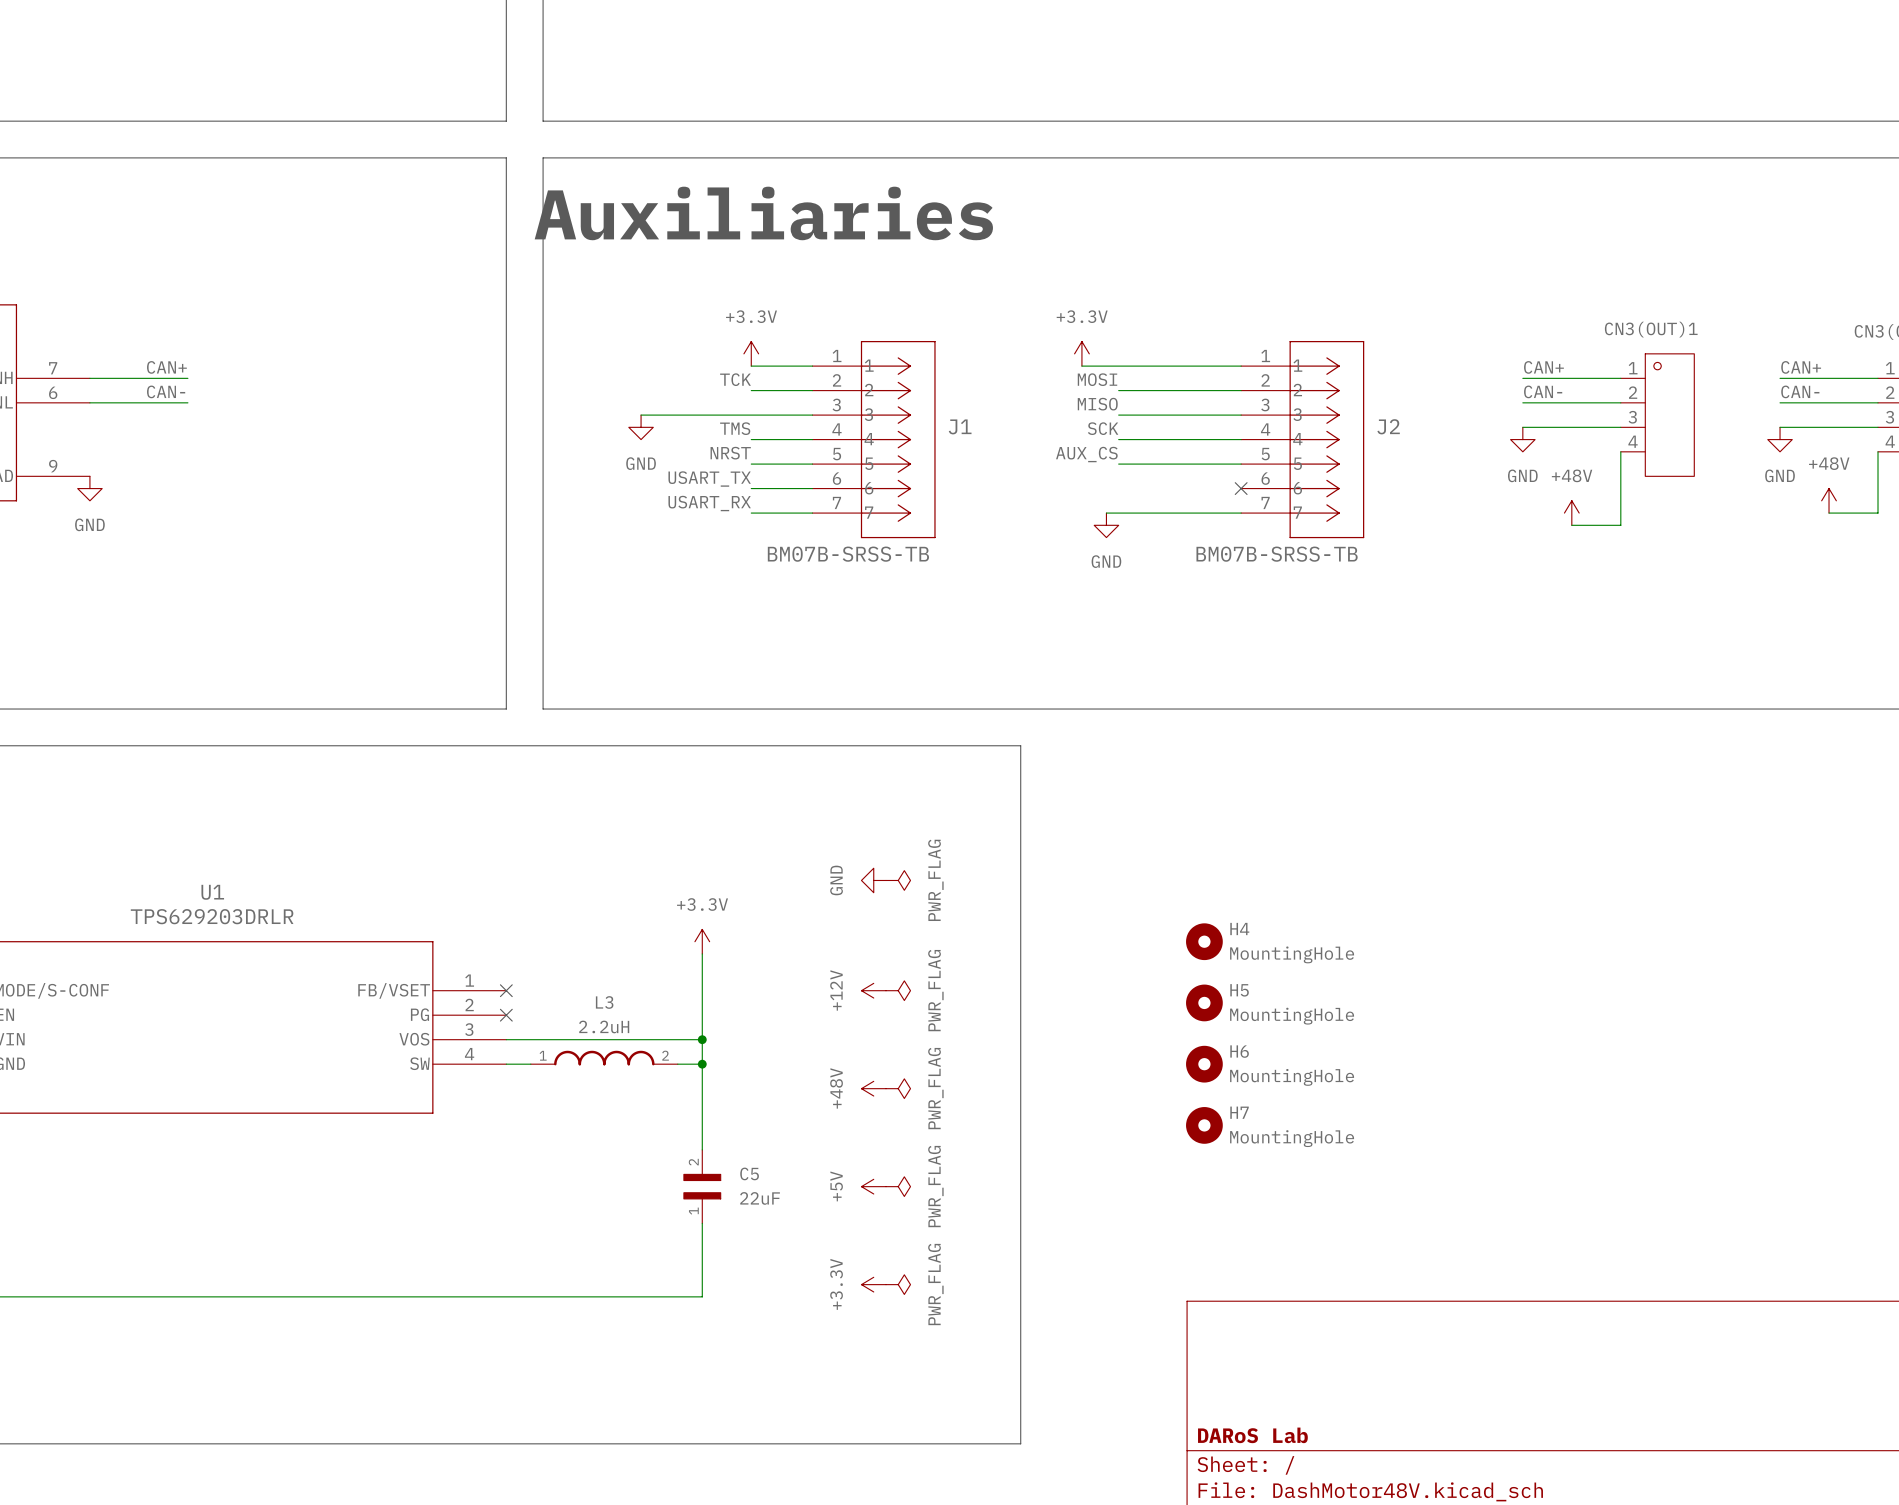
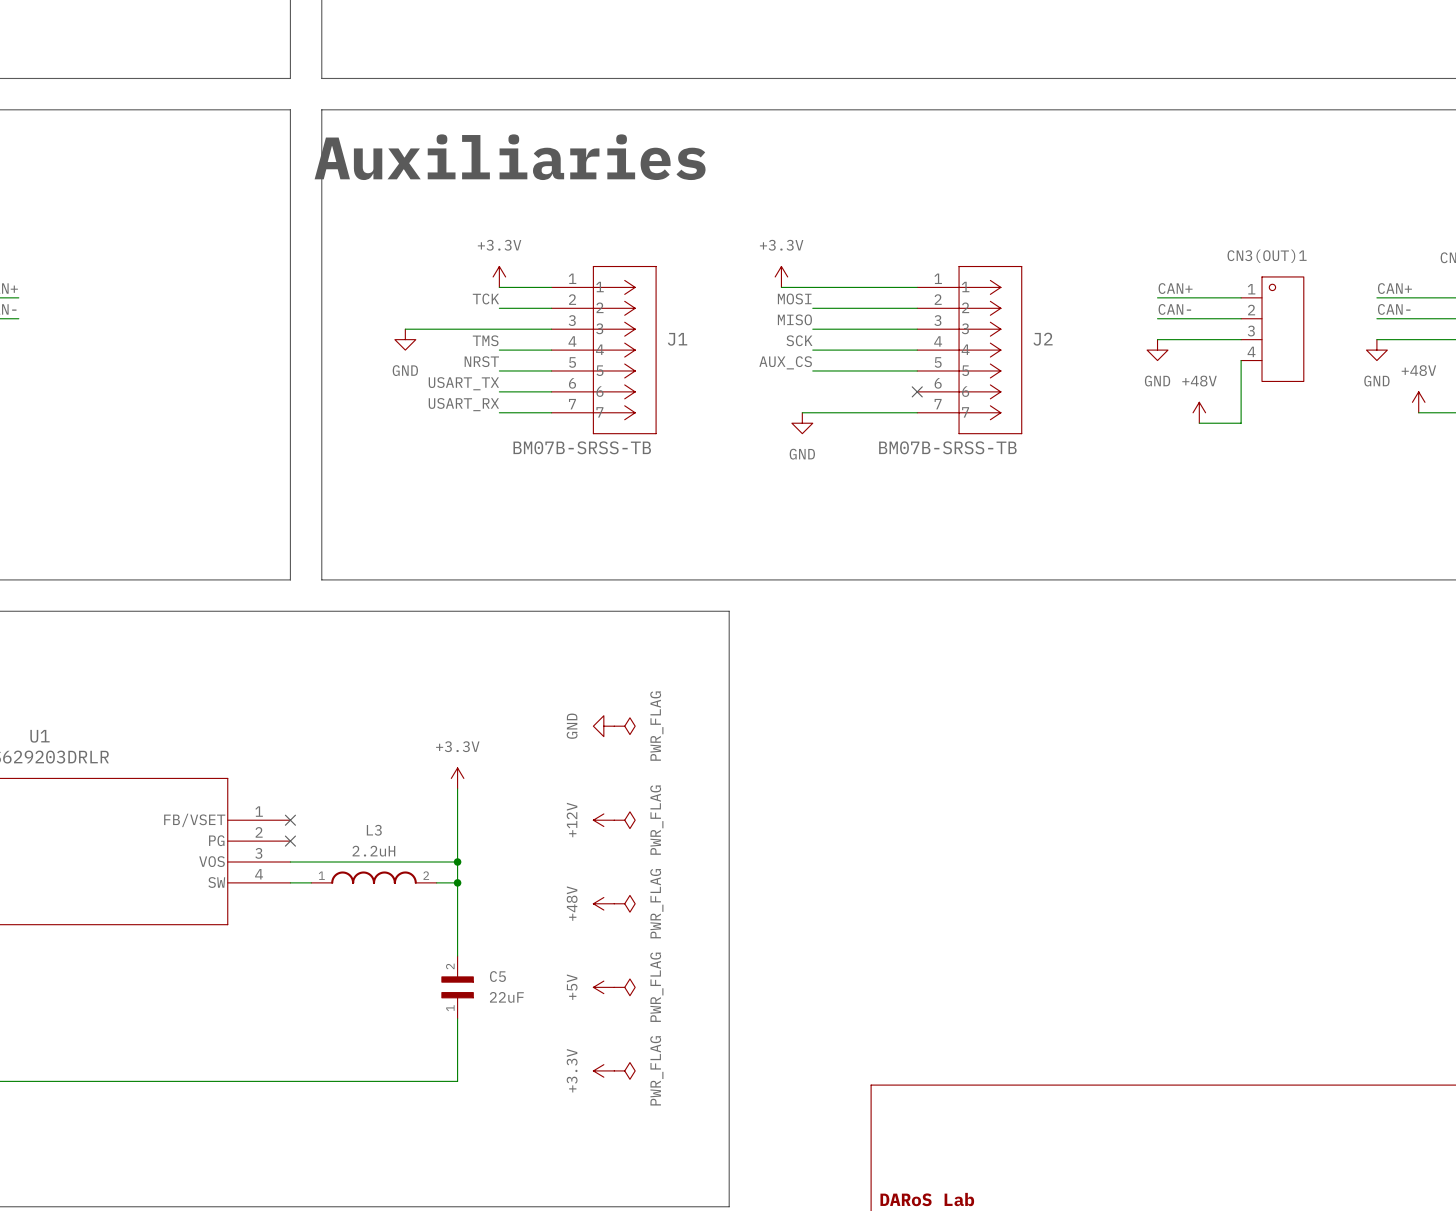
H4: MountingHole (1204, 941) -> none
H5: MountingHole (1204, 1002) -> none
H6: MountingHole (1204, 1064) -> none
H7: MountingHole (1204, 1125) -> none

